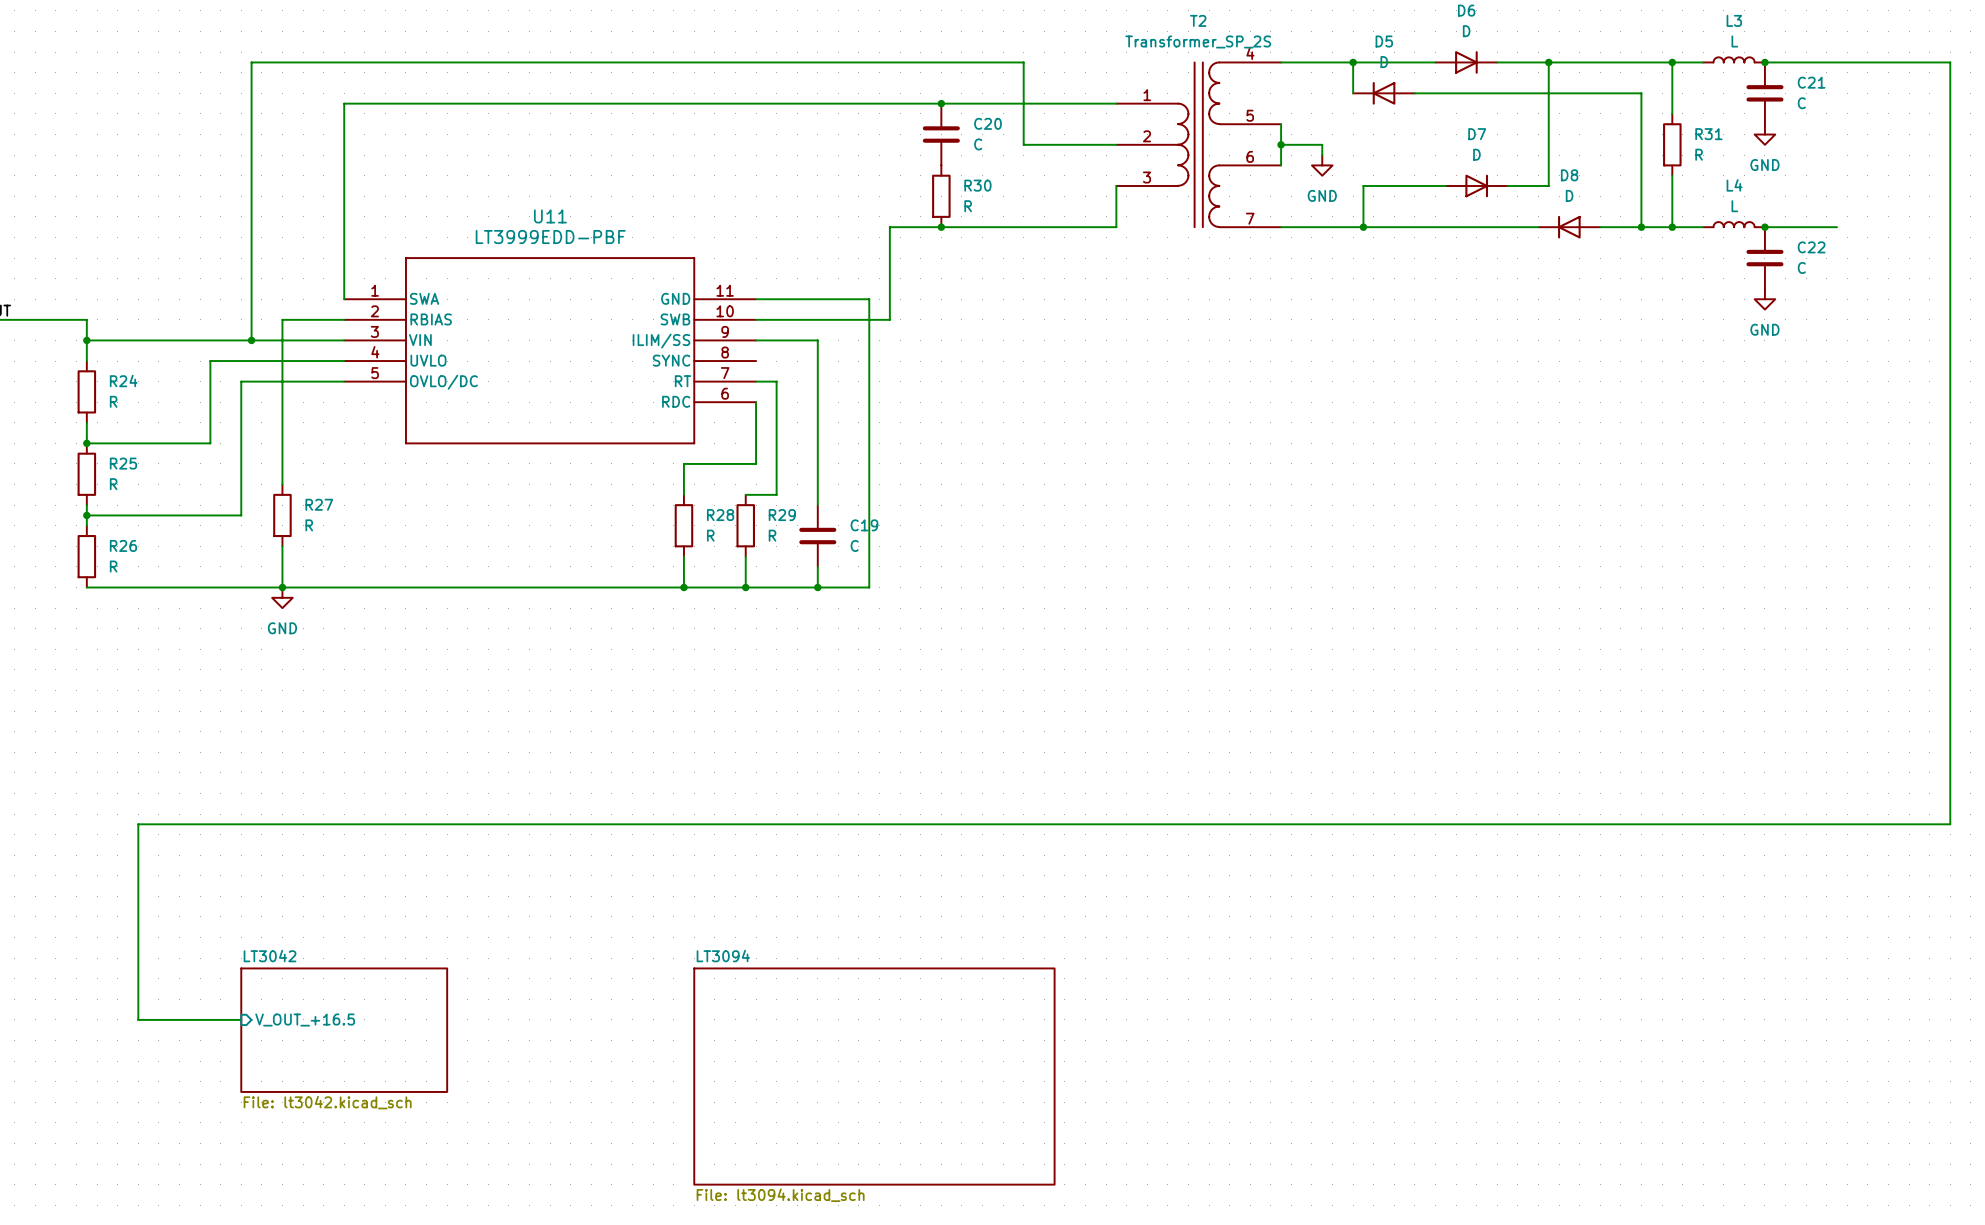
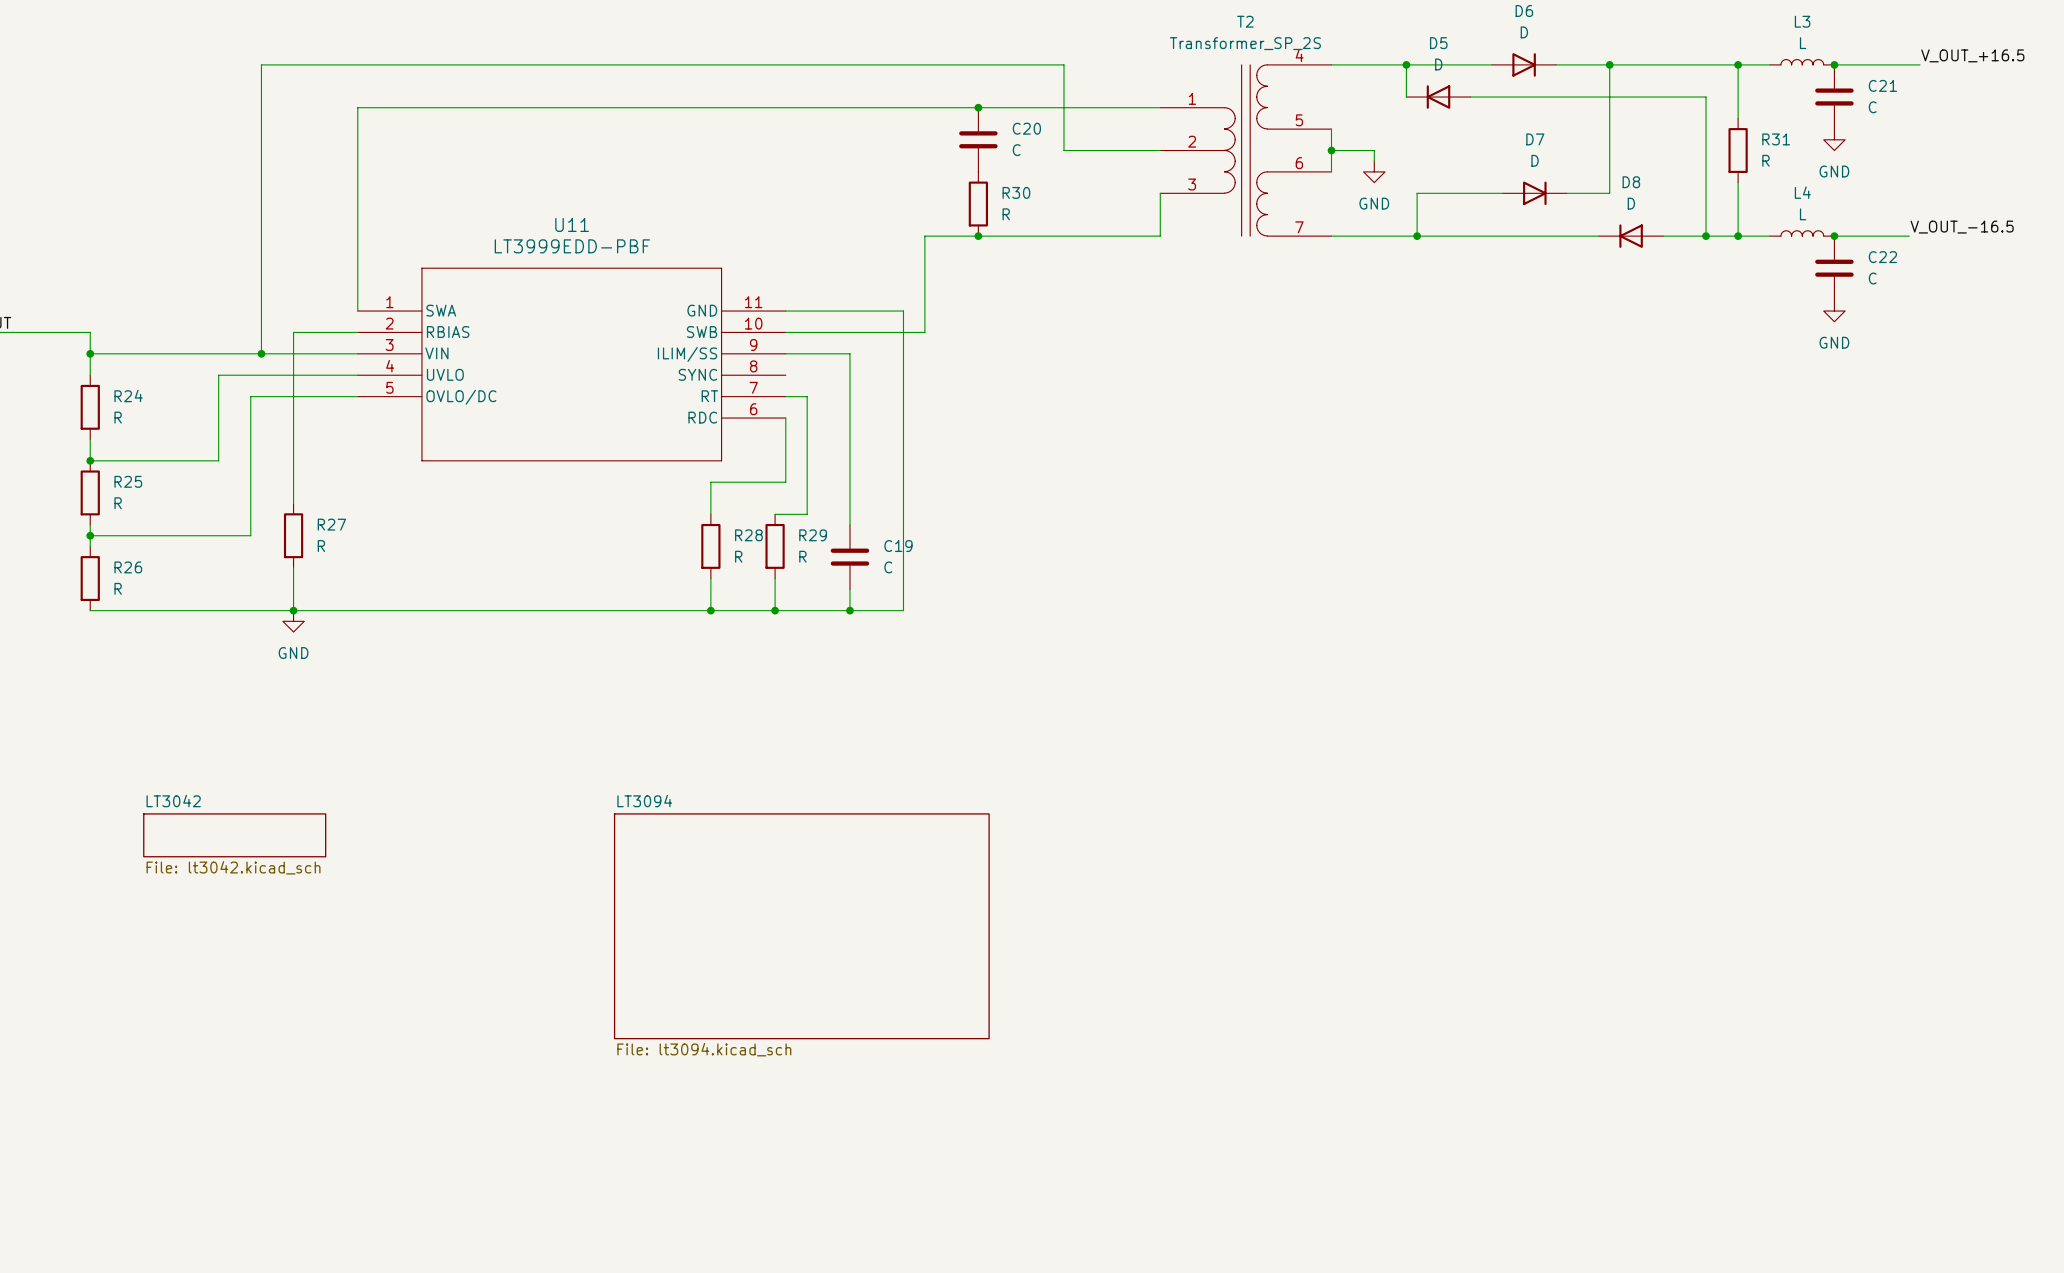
label: none -> V_OUT_+16.5 (1972, 55)
wire: (1847, 62) (1950, 62) (1950, 824) (138, 824) (138, 1019) (241, 1019) -> none
label: none -> V_OUT_-16.5 (1962, 227)
sheet LT3042 name position: LT3042 (270, 956) -> LT3042 (173, 801)
sheet LT3042 shape: [240, 967, 448, 1093] -> [143, 813, 327, 858]
sheet pin: V_OUT_+16.5 (305, 1020) -> none
sheet LT3094 position: (874, 1076) -> (801, 926)
sheet LT3042 value position: File: lt3042.kicad_sch (327, 1102) -> File: lt3042.kicad_sch (233, 867)

